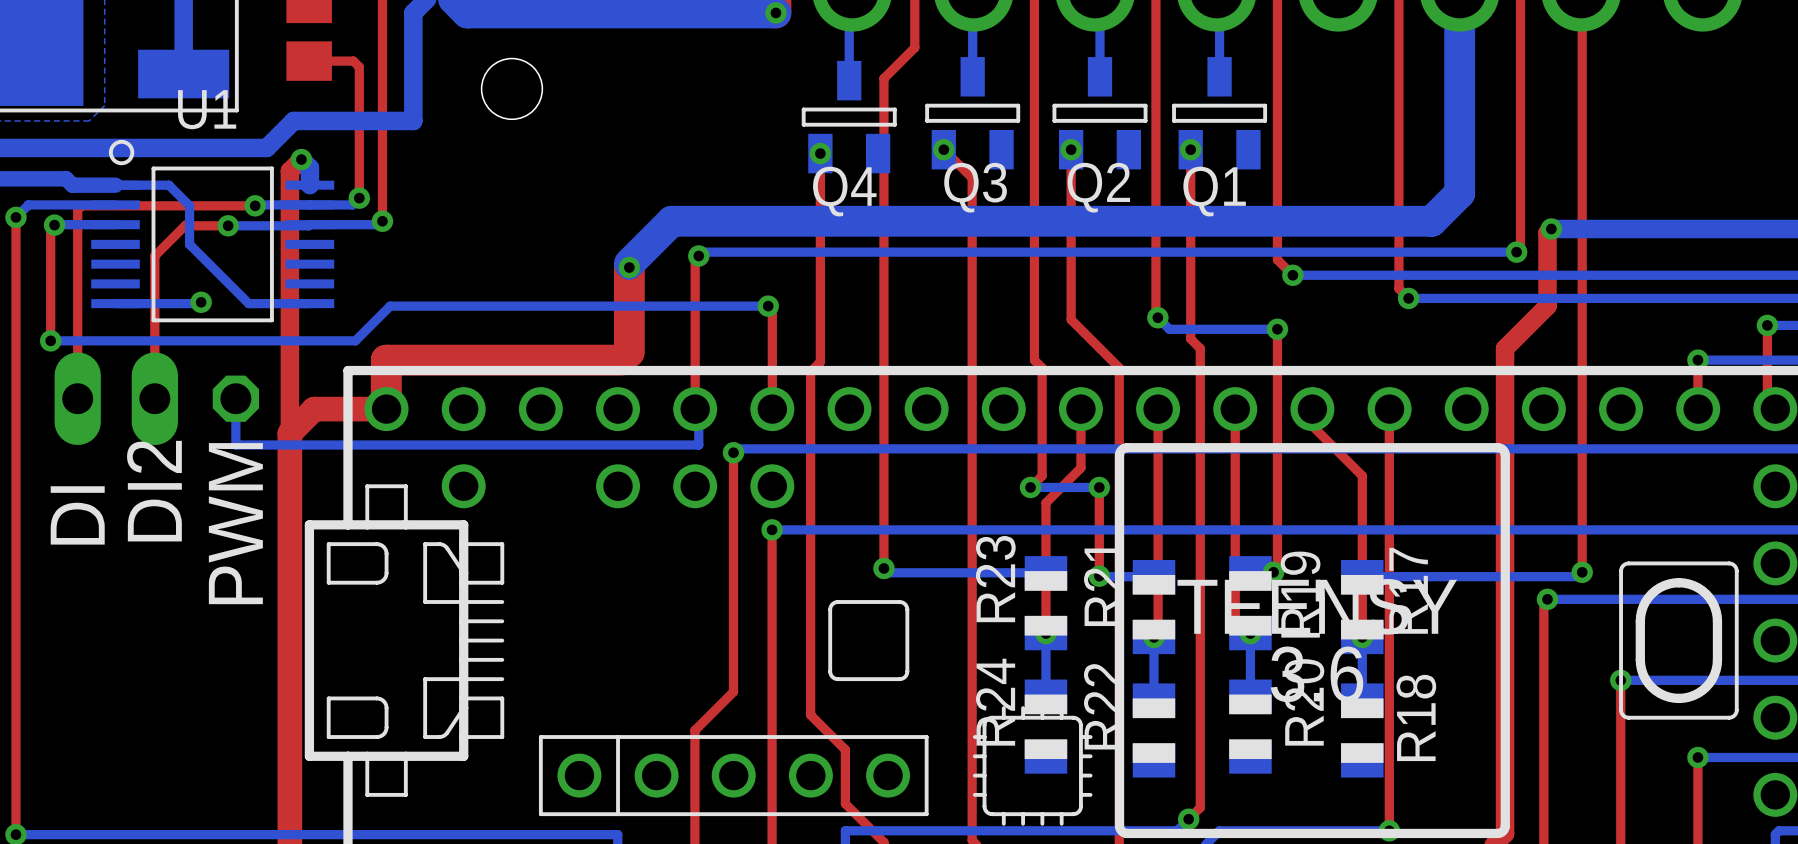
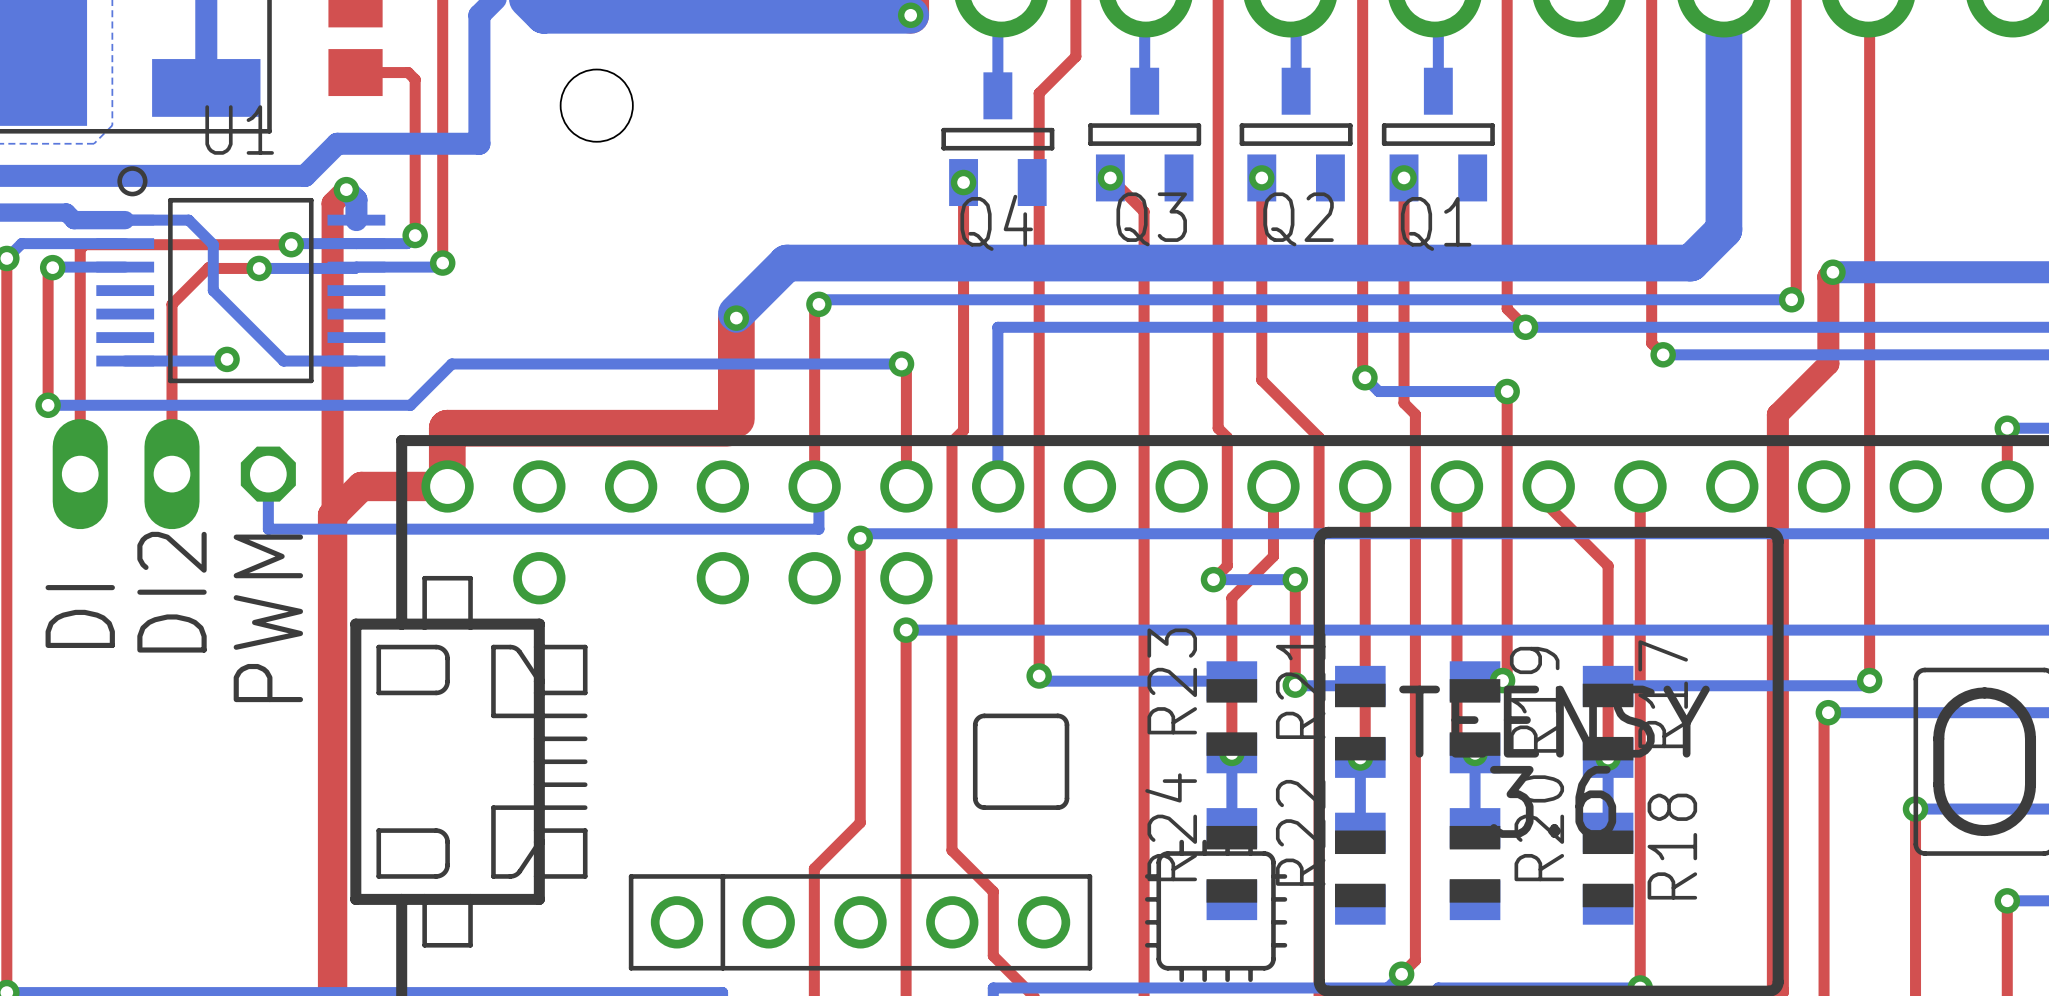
bottom track: none -> (1525, 327) (997, 327) (997, 486)

